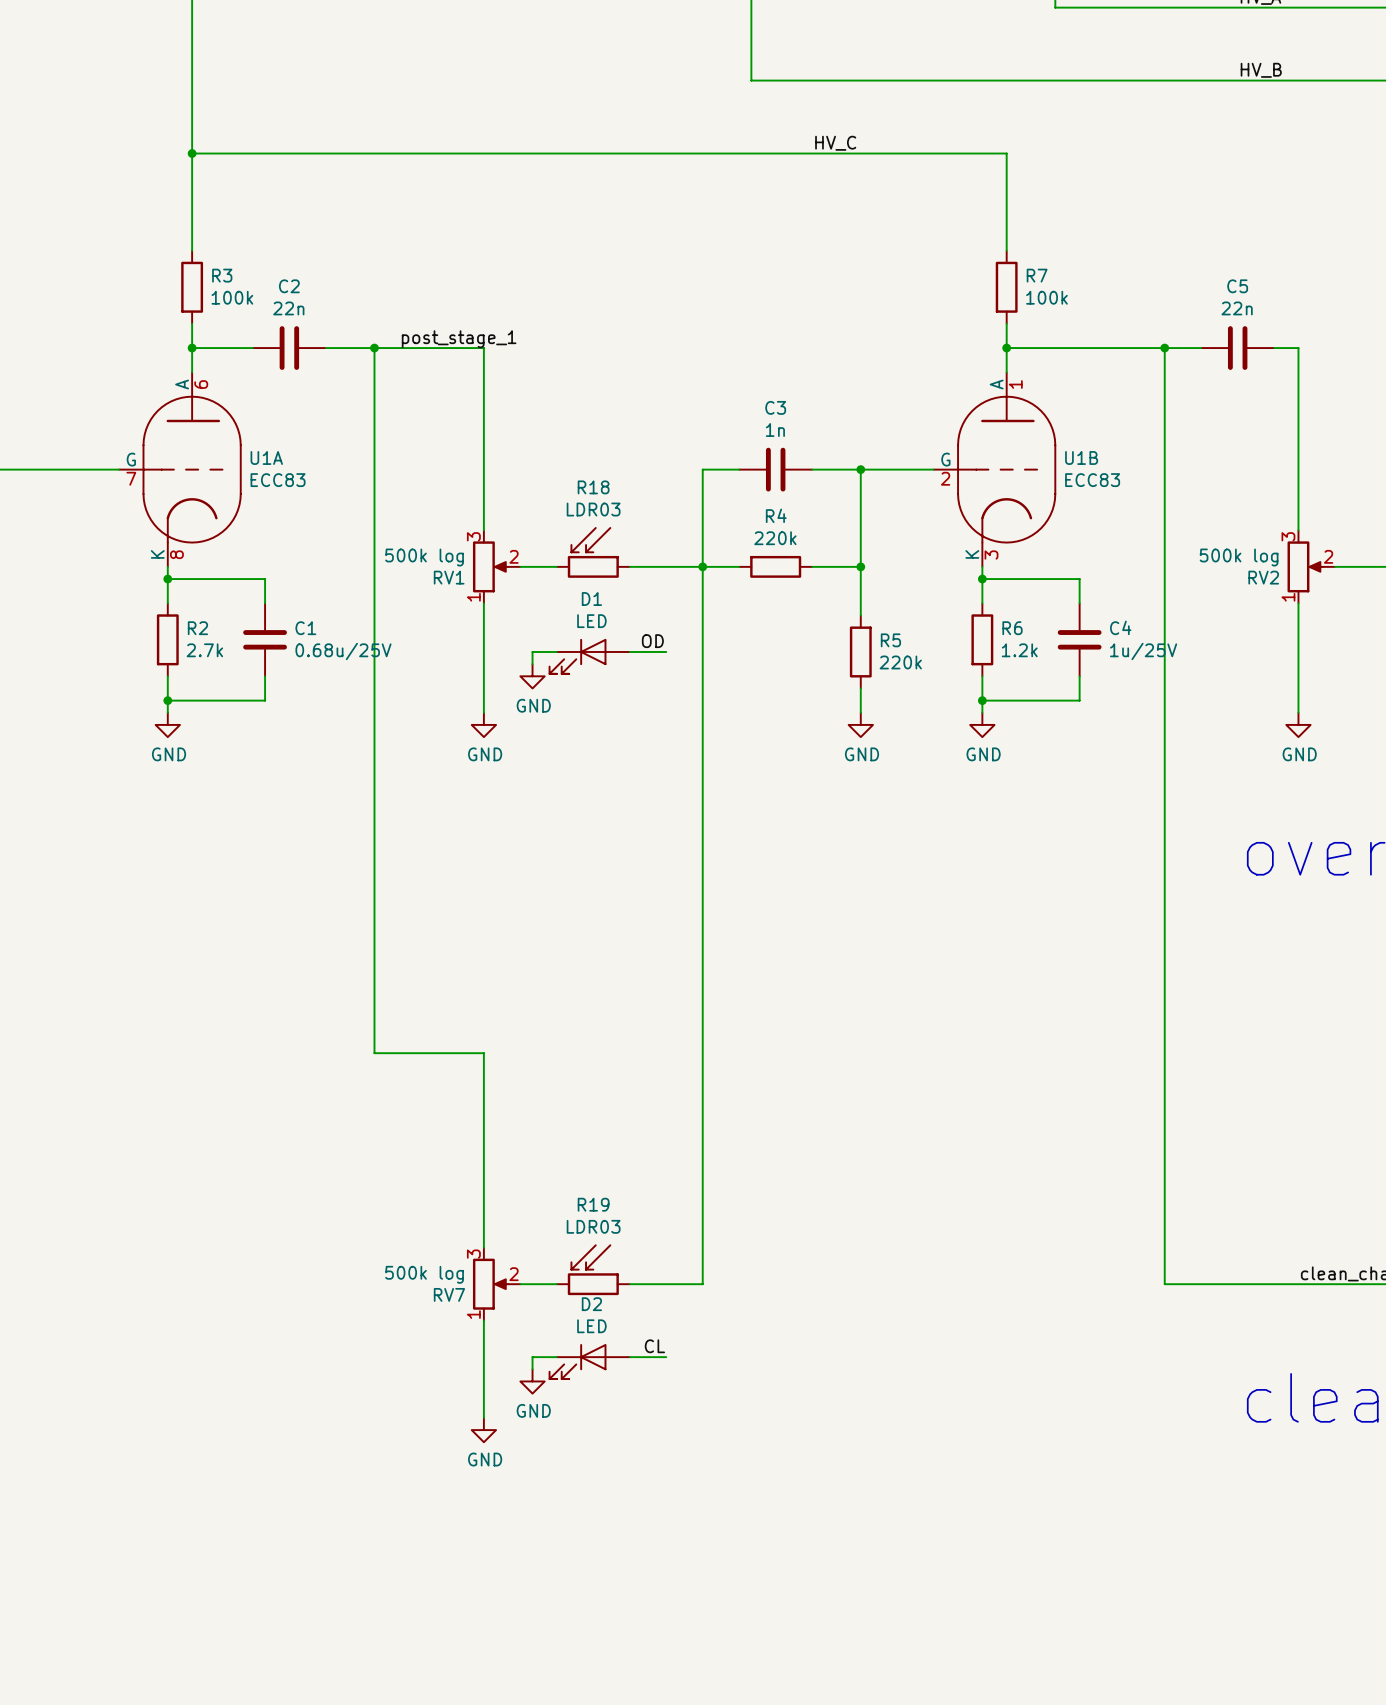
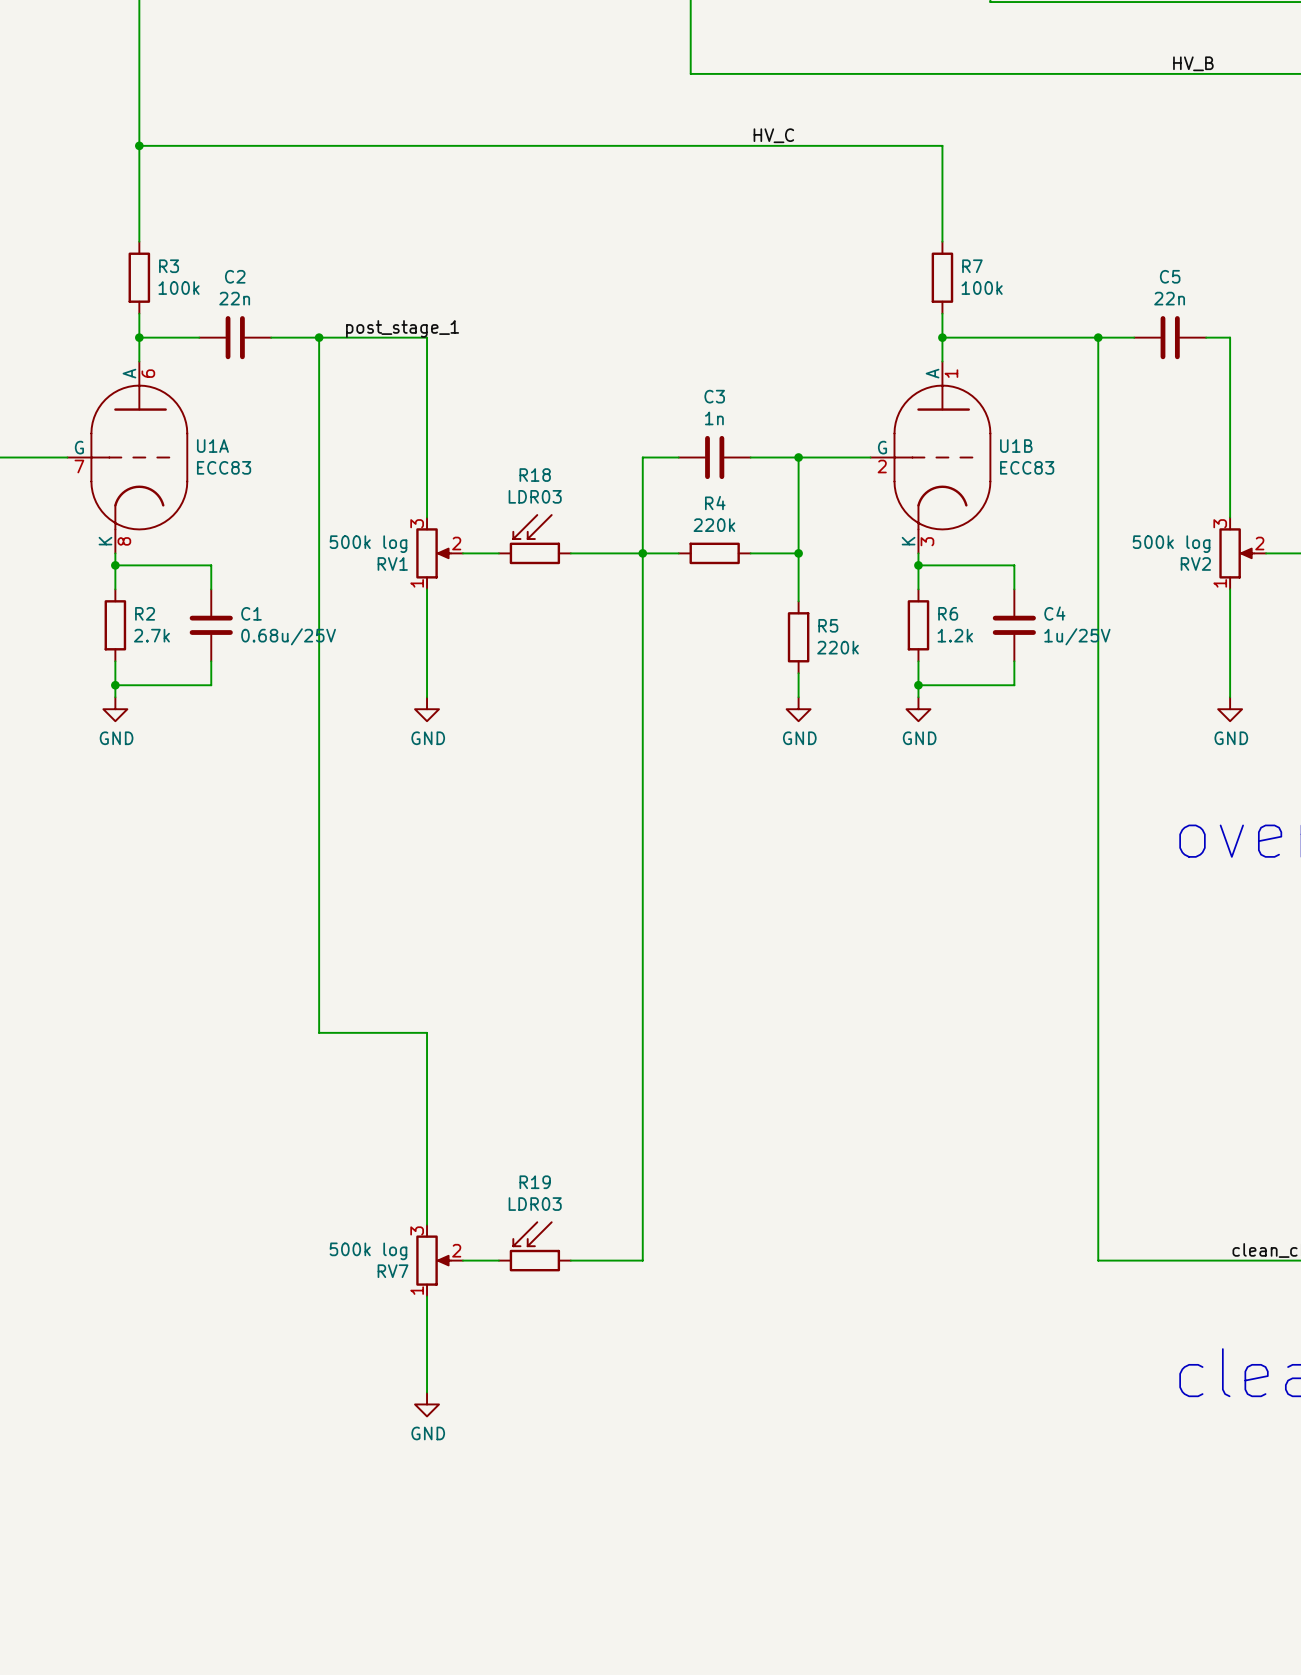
label: OD (652, 641) -> none
wire: (556, 651) (532, 651) (532, 664) -> none
wire: (629, 651) (666, 651) -> none
D1: LED (589, 656) -> none
power symbol: GND (532, 676) -> none
label: CL (654, 1346) -> none
wire: (556, 1357) (532, 1357) (532, 1369) -> none
wire: (629, 1357) (666, 1357) -> none
D2: LED (589, 1361) -> none
power symbol: GND (532, 1381) -> none

